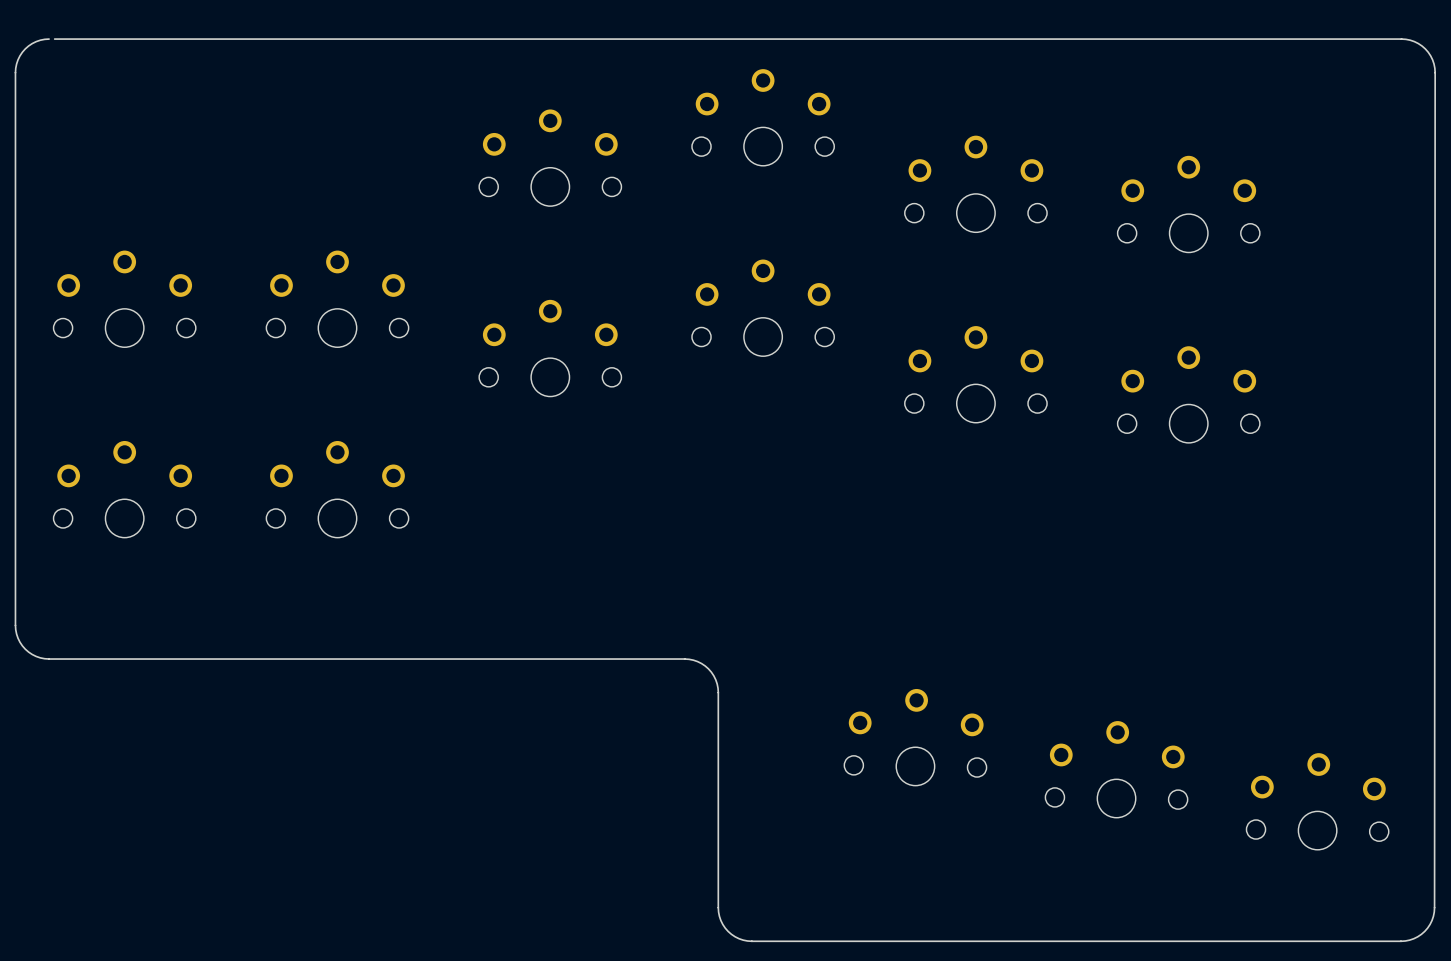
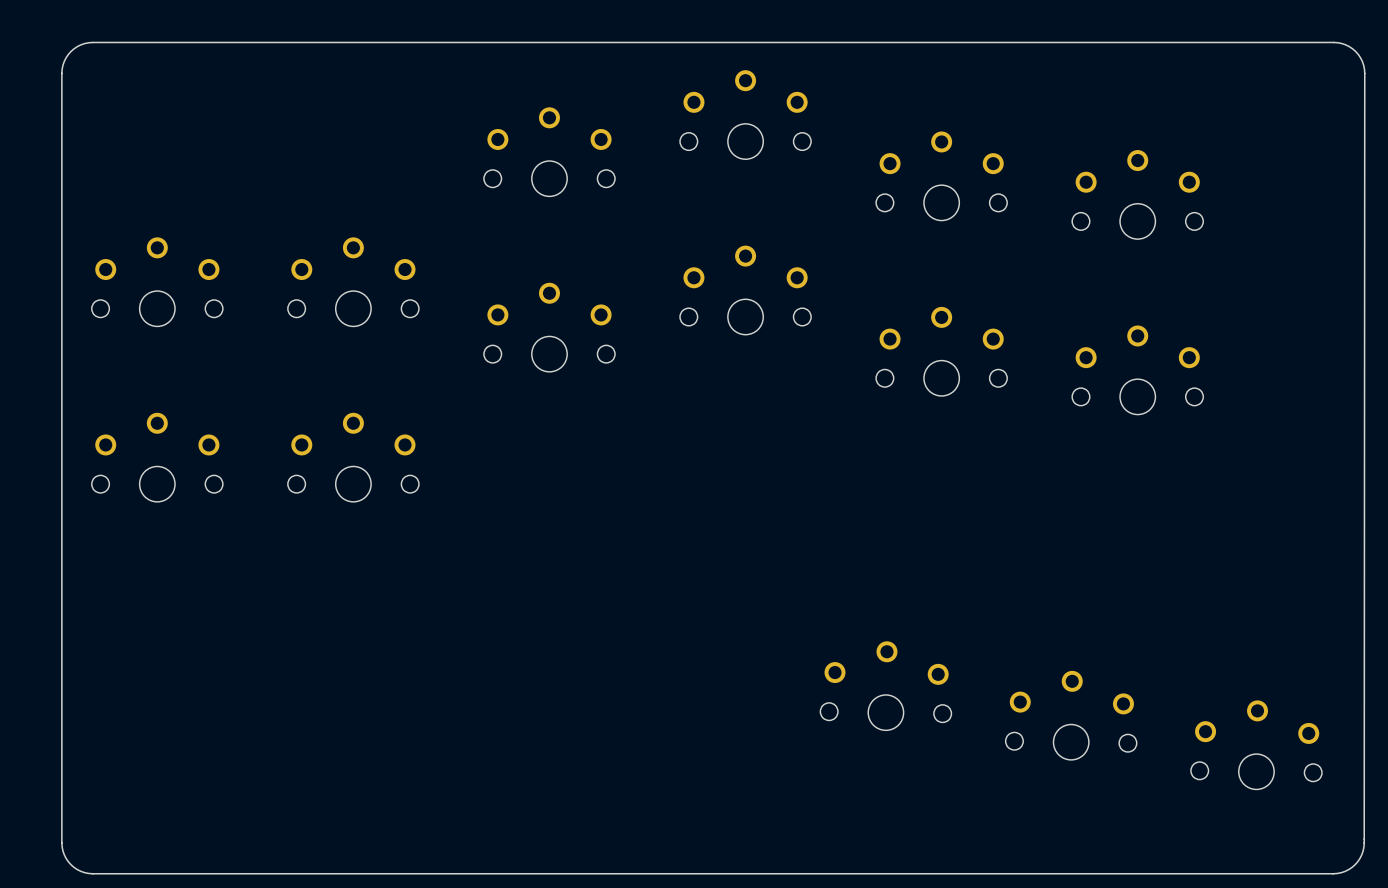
board edge: (49, 39) (36, 41) (25, 48) (18, 59) (15, 72) (15, 625) (16, 634) (22, 645) (32, 654) (49, 659) (684, 659) (697, 661) (711, 672) (718, 688) (718, 912) (722, 924) (731, 934) (743, 940) (751, 941) -> (92, 42) (80, 44) (70, 51) (64, 61) (61, 73) (61, 842) (62, 850) (68, 861) (77, 869) (92, 873) (735, 873)

